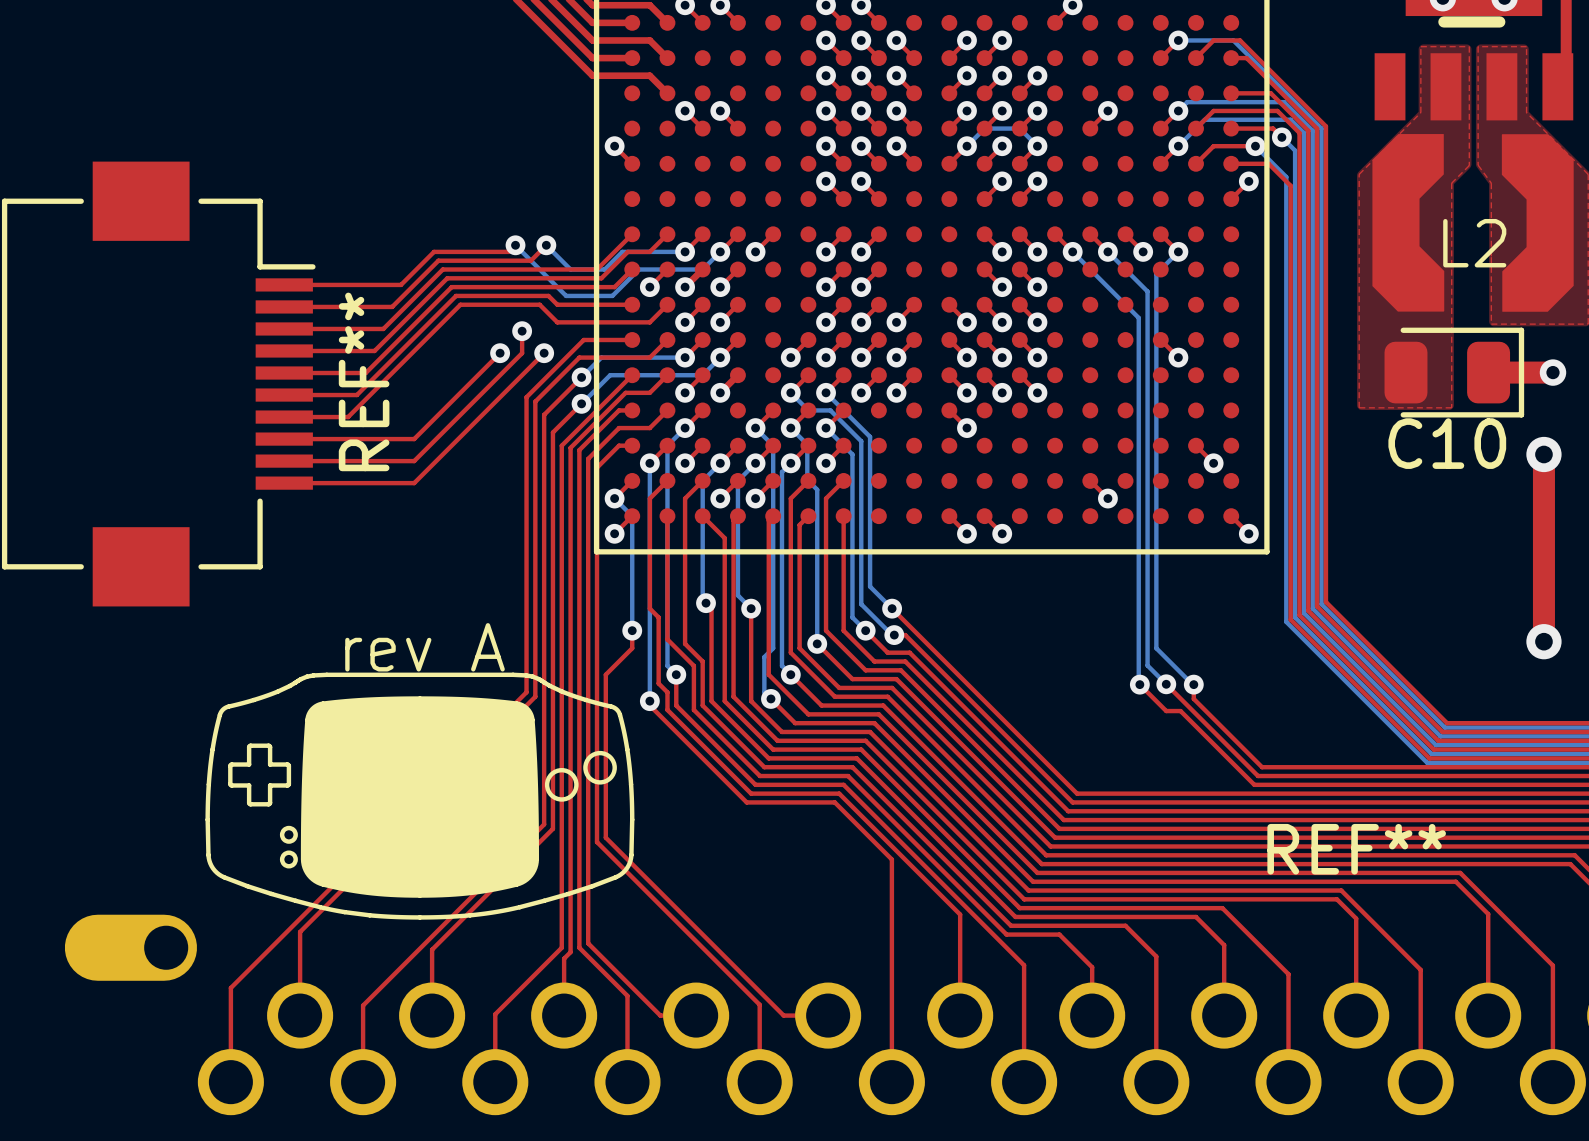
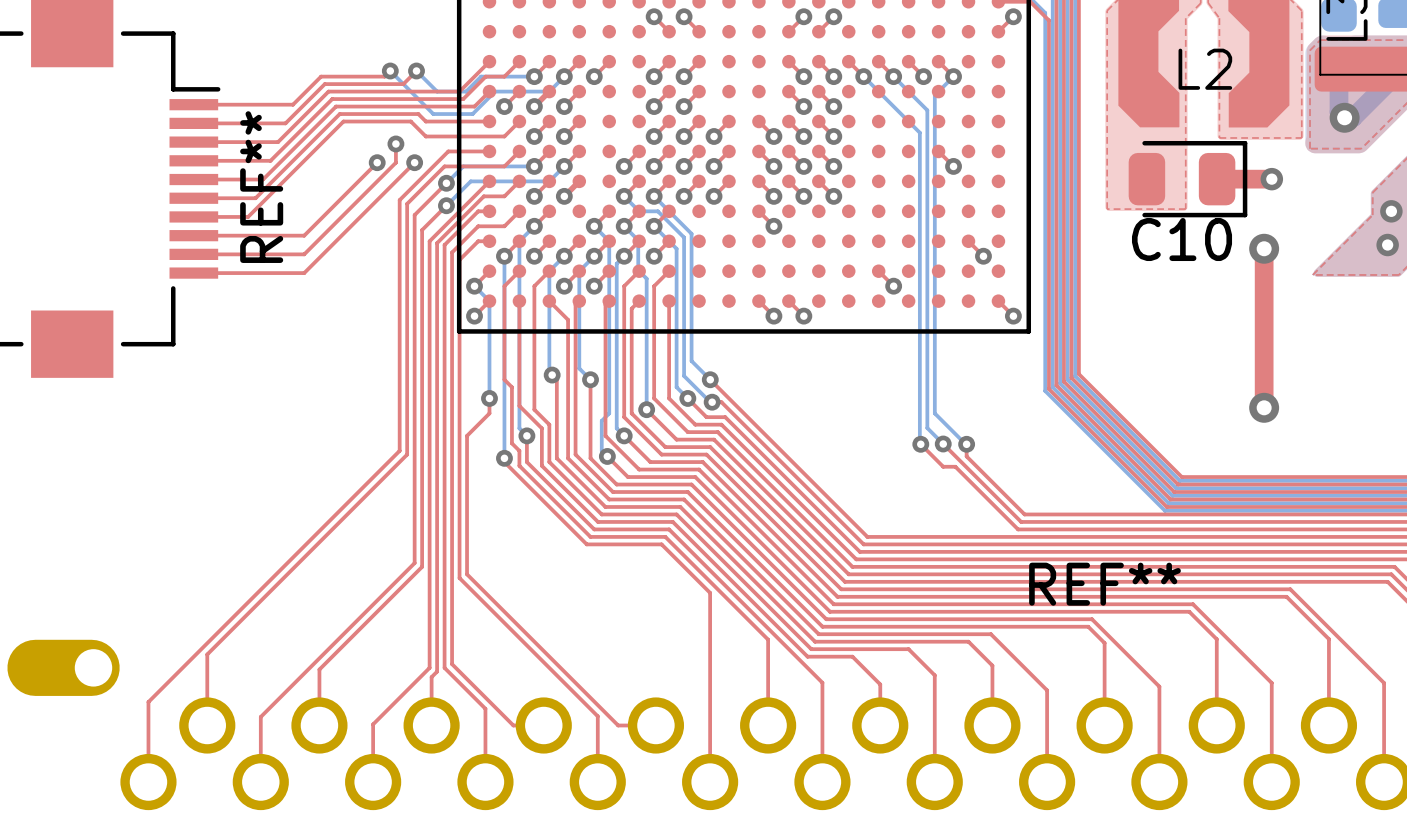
text: rev A (425, 647) -> none
line: (326, 674) (306, 676) (272, 693) (226, 707) (220, 712) (211, 757) (207, 815) (208, 857) (211, 865) (219, 874) (271, 893) (330, 909) (375, 915) (430, 917) (476, 914) (519, 907) (592, 886) (618, 875) (626, 868) (631, 855) (630, 779) (623, 729) (619, 713) (614, 707) (570, 694) (538, 679) (526, 675) (326, 674) -> none
drawing: [279, 698, 617, 896] -> none
line: (419, 698) (364, 699) (323, 703) (315, 706) (309, 712) (307, 719) (304, 762) (303, 859) (307, 872) (317, 882) (372, 893) (441, 895) (478, 891) (516, 884) (524, 881) (532, 872) (536, 859) (536, 806) (533, 728) (530, 712) (524, 706) (516, 703) (475, 699) (419, 698) -> none
line: (250, 745) (269, 745) (270, 764) (288, 765) (288, 784) (270, 785) (268, 804) (250, 804) (249, 785) (230, 784) (230, 765) (249, 764) (250, 745) -> none

